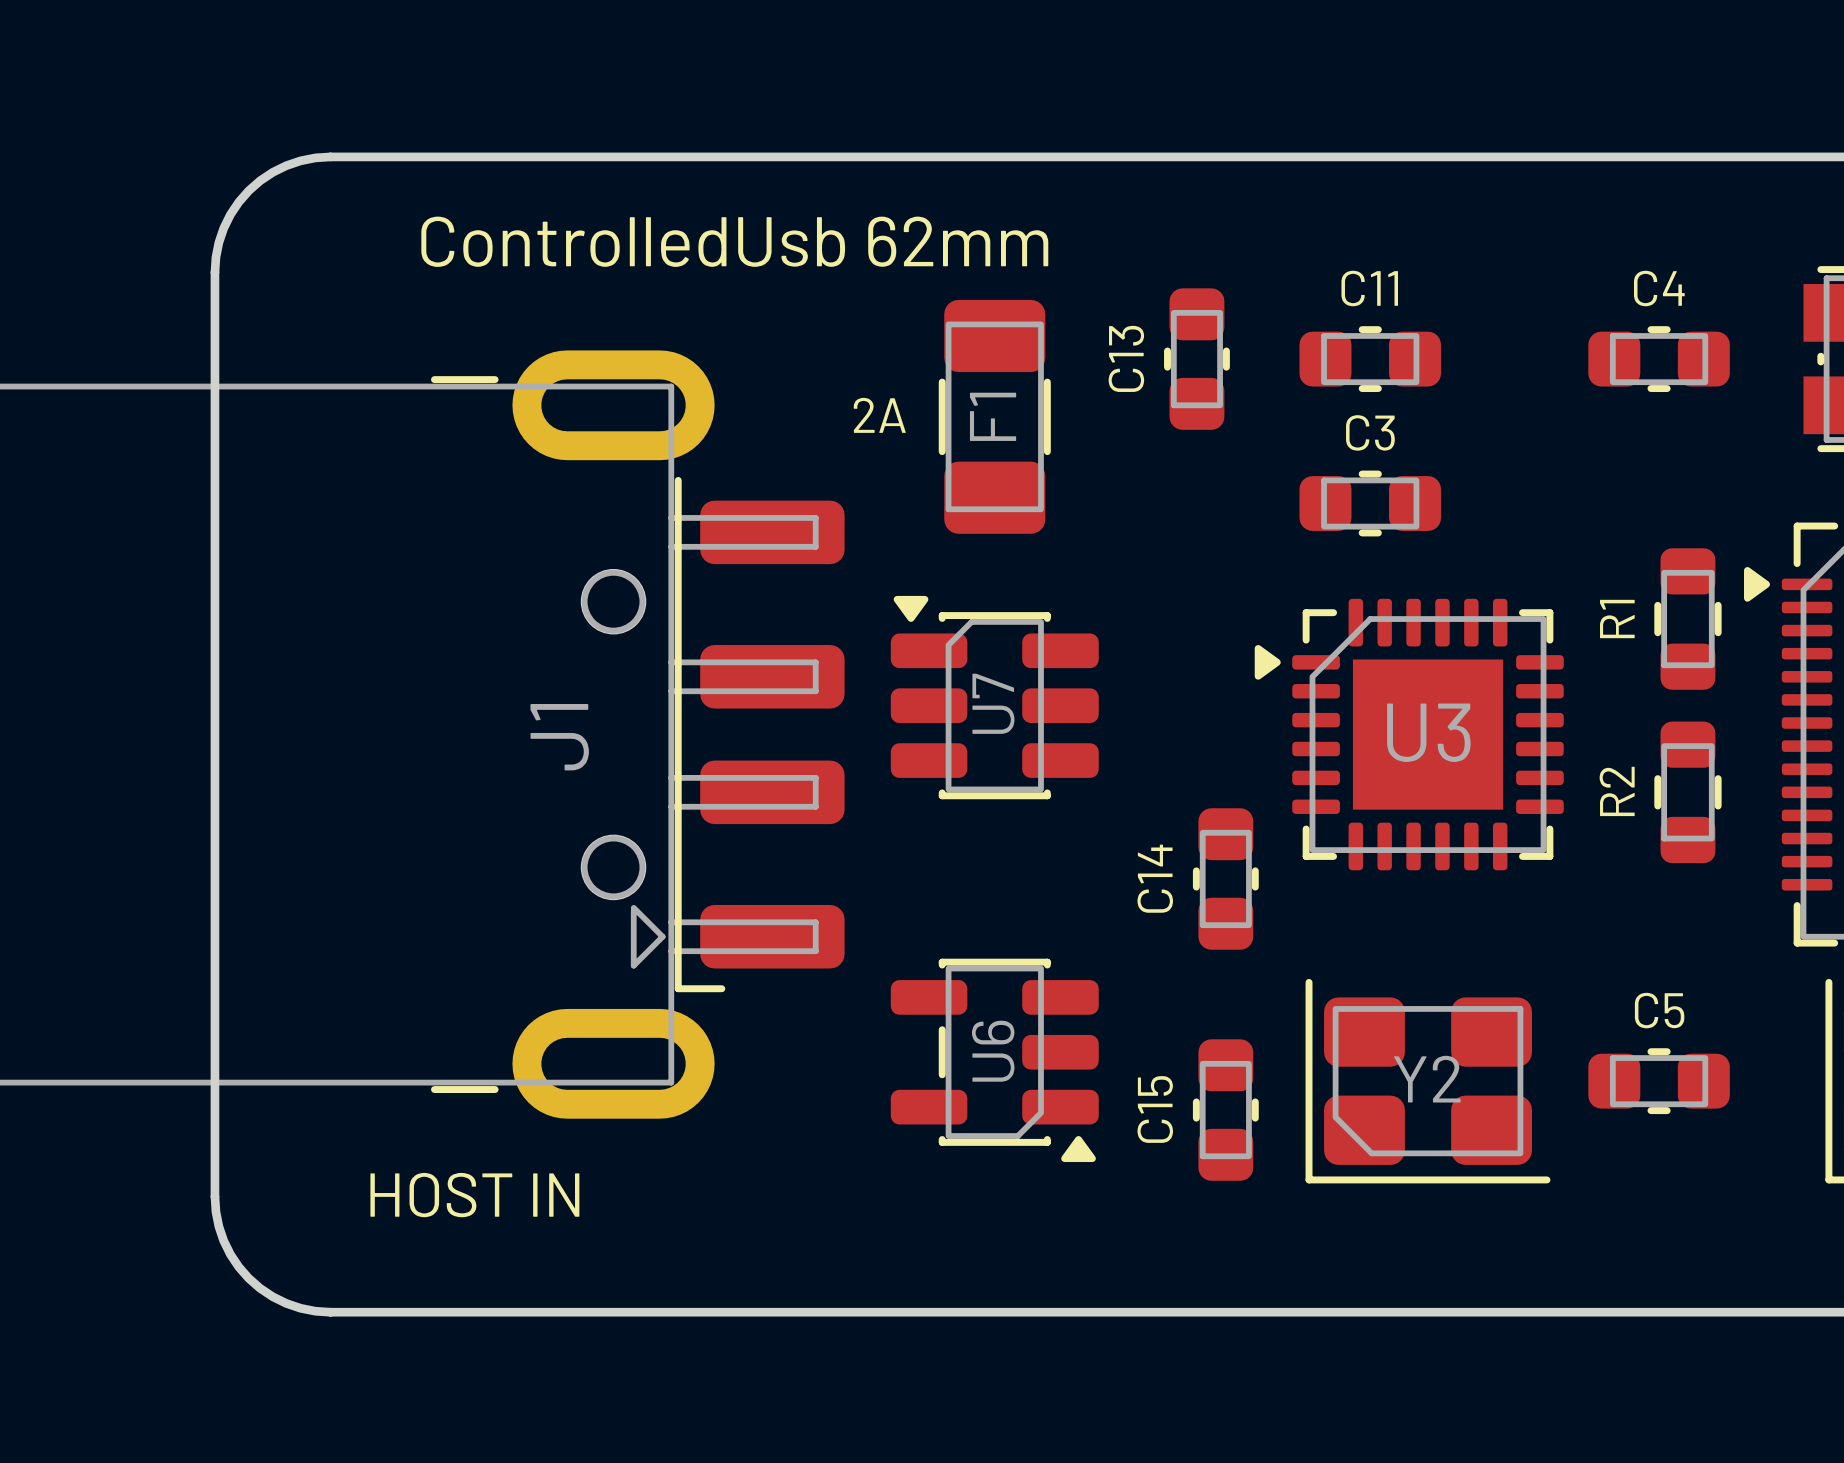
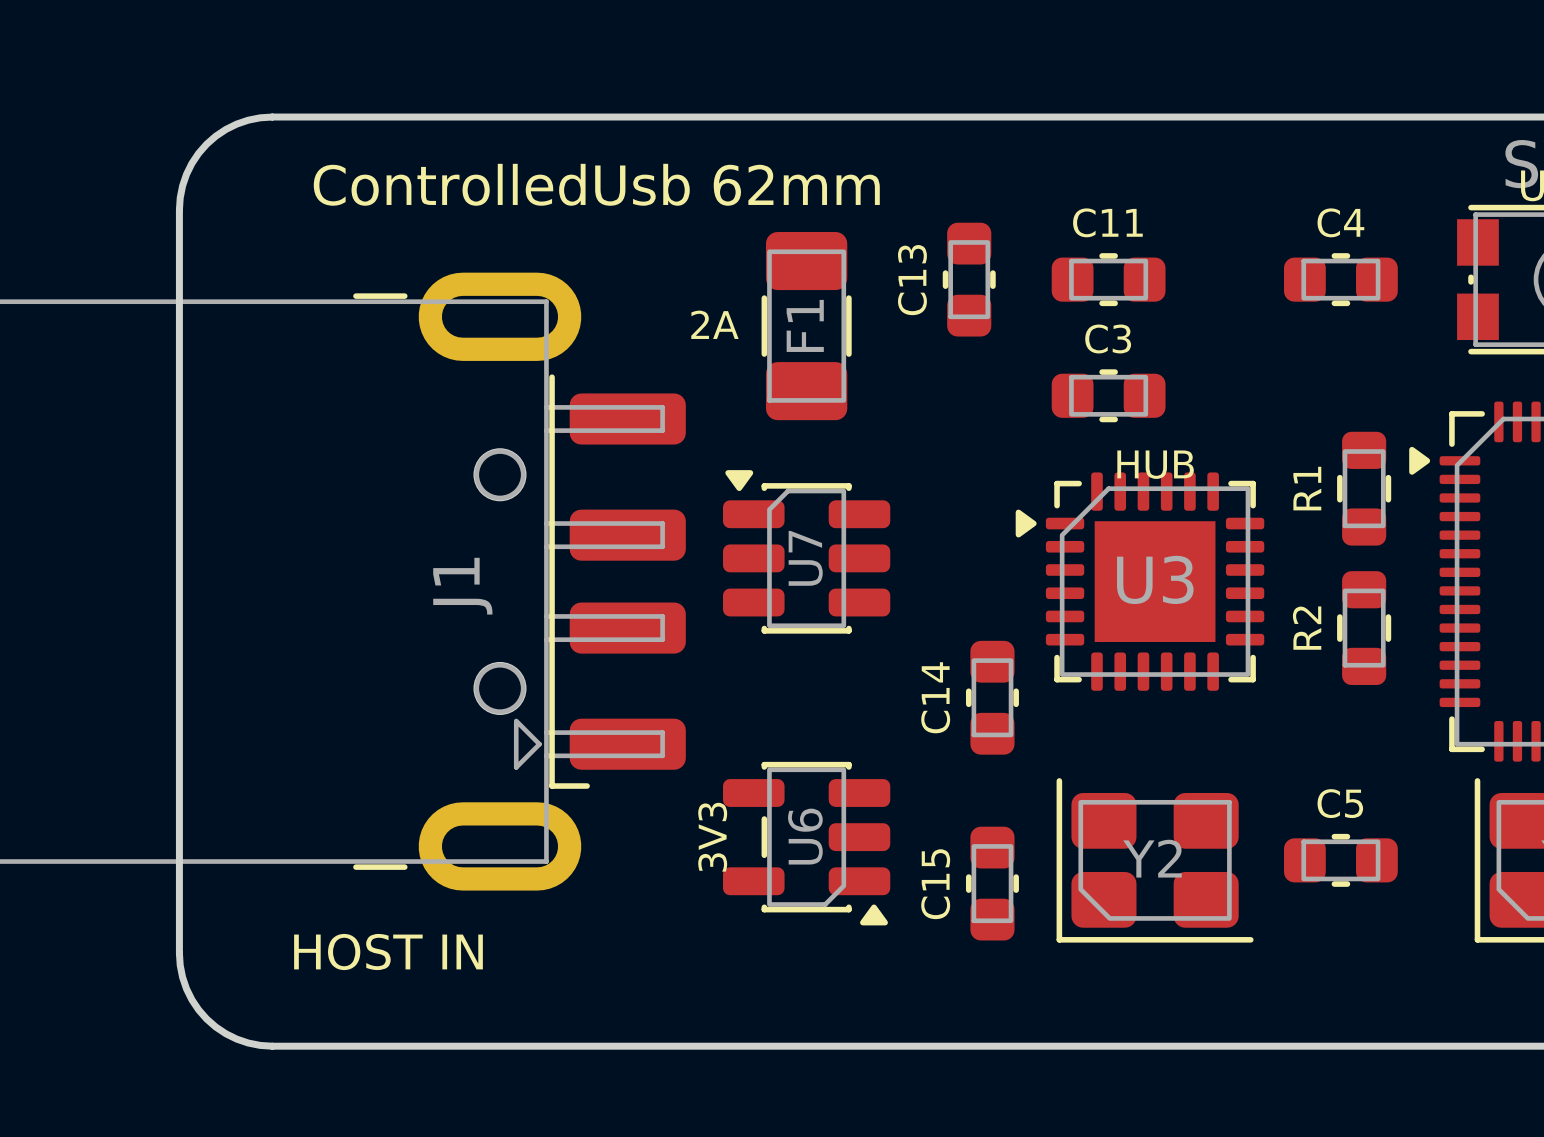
text: none -> HUB (1155, 464)
text: none -> 3V3 (712, 837)

